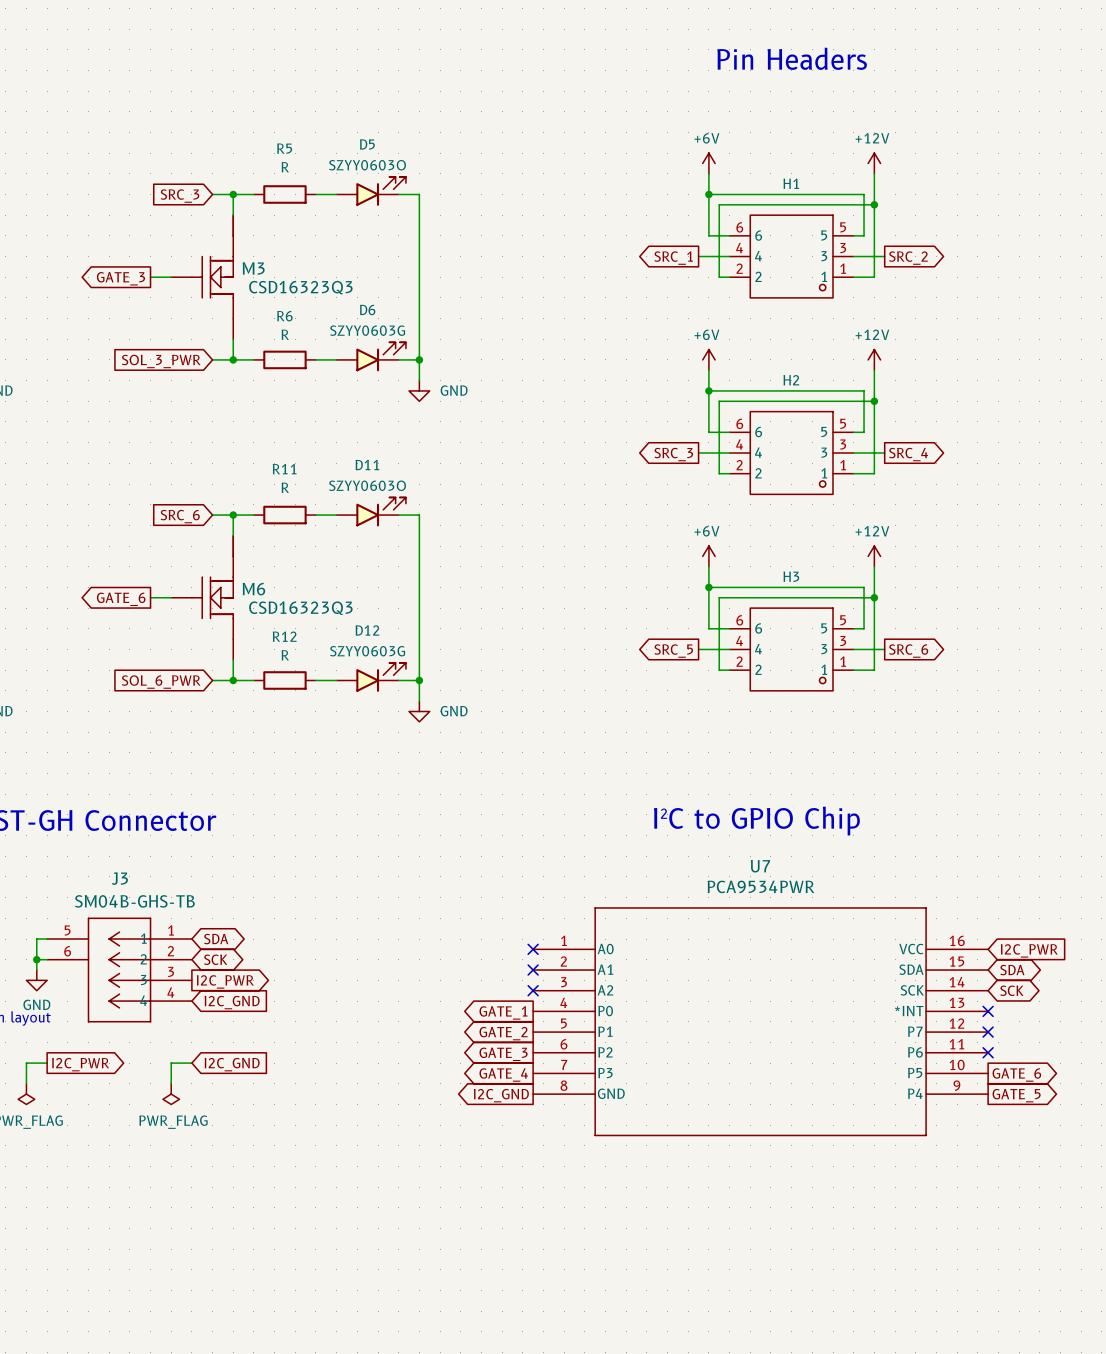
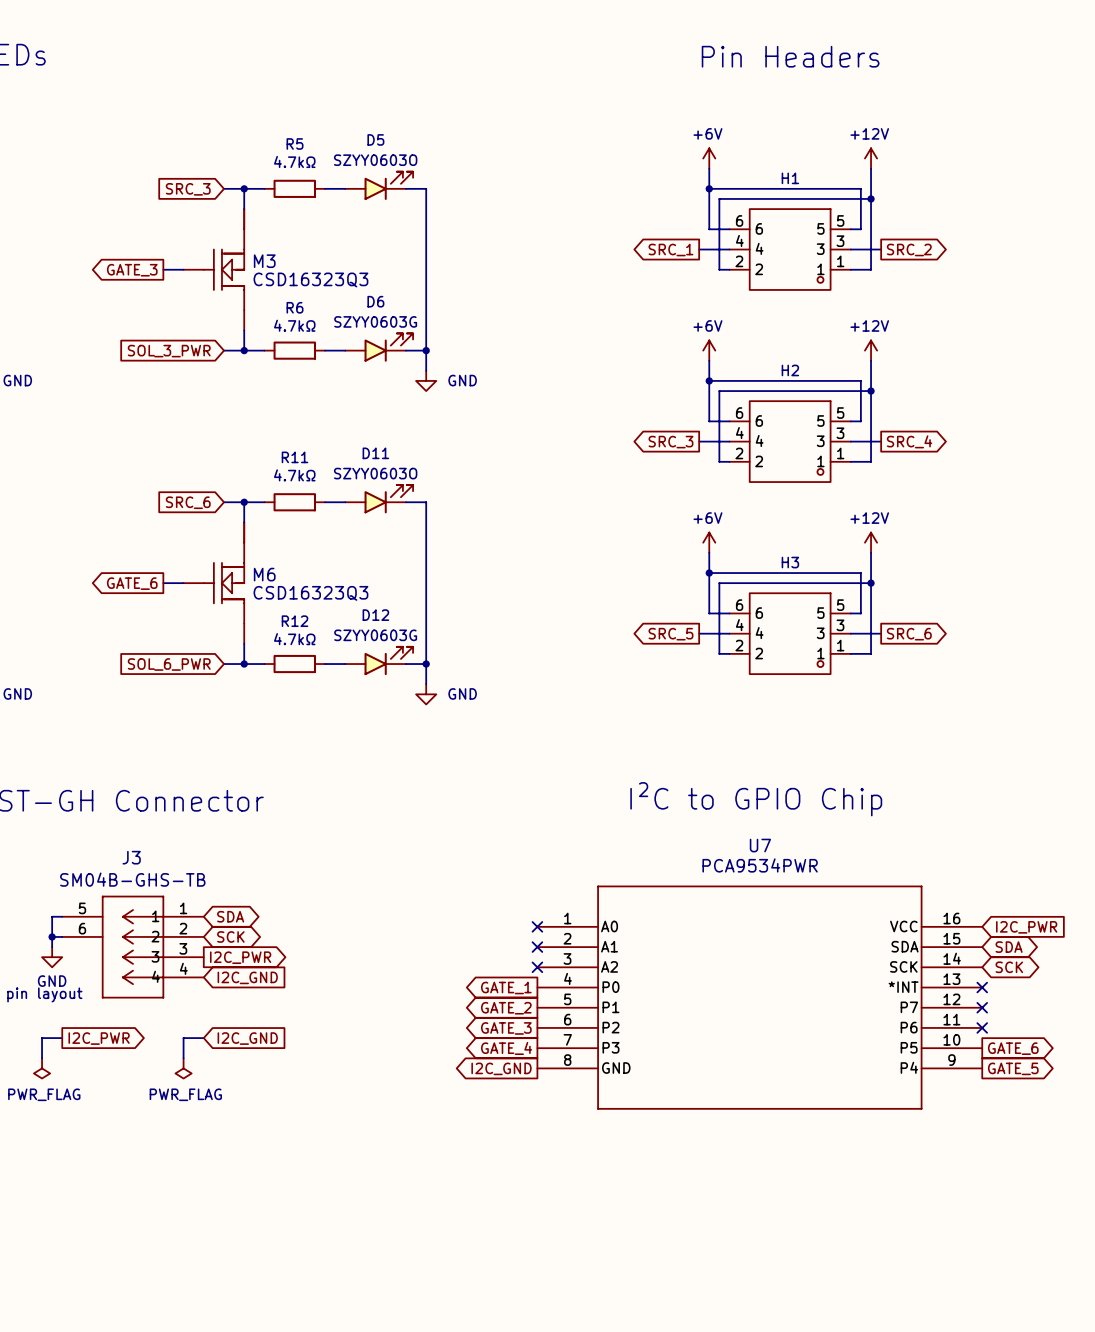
R5 value: R (285, 167) -> 4.7kΩ (294, 161)
R6 value: R (285, 334) -> 4.7kΩ (294, 325)
R11 value: R (285, 487) -> 4.7kΩ (294, 475)
R12 value: R (285, 655) -> 4.7kΩ (294, 639)

